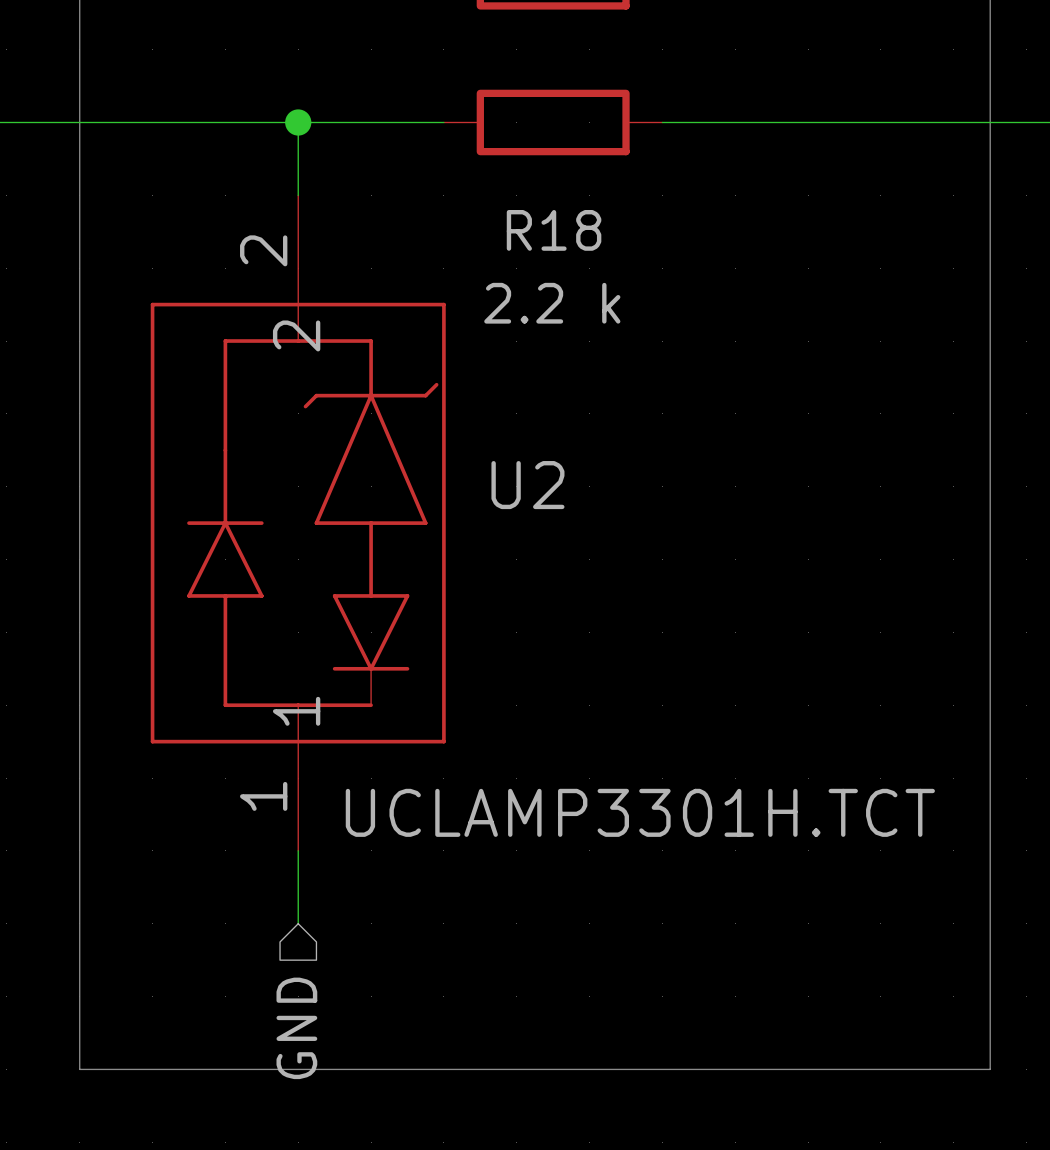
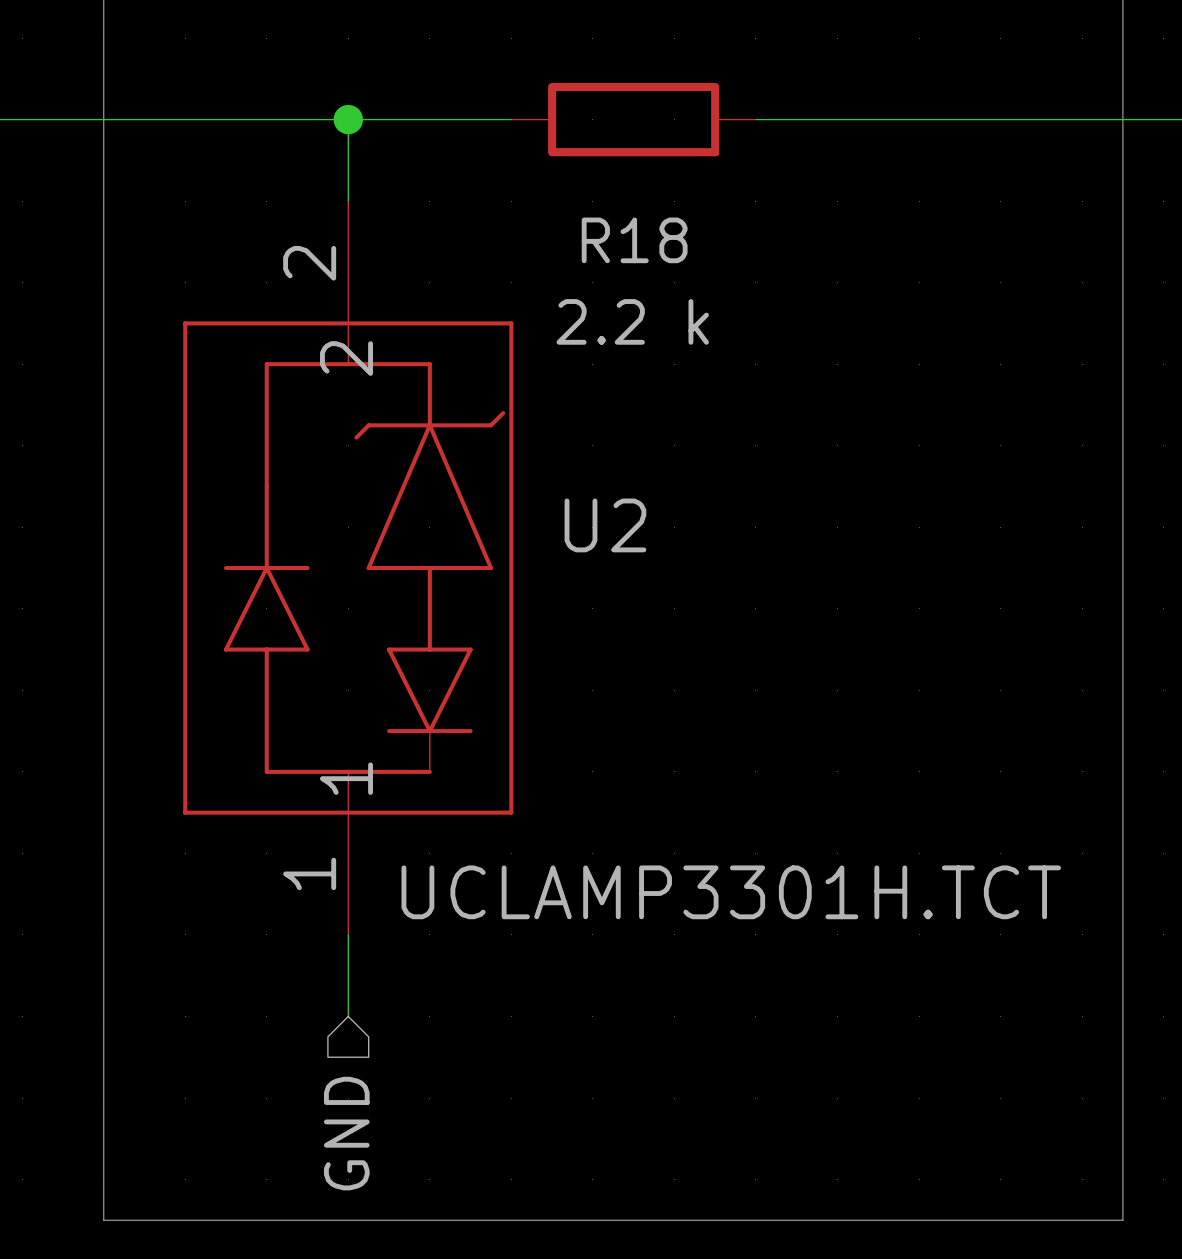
line: (79, 1069) (990, 1069) -> (103, 1179) (103, 1220) (1122, 1220) (1122, 1179)

